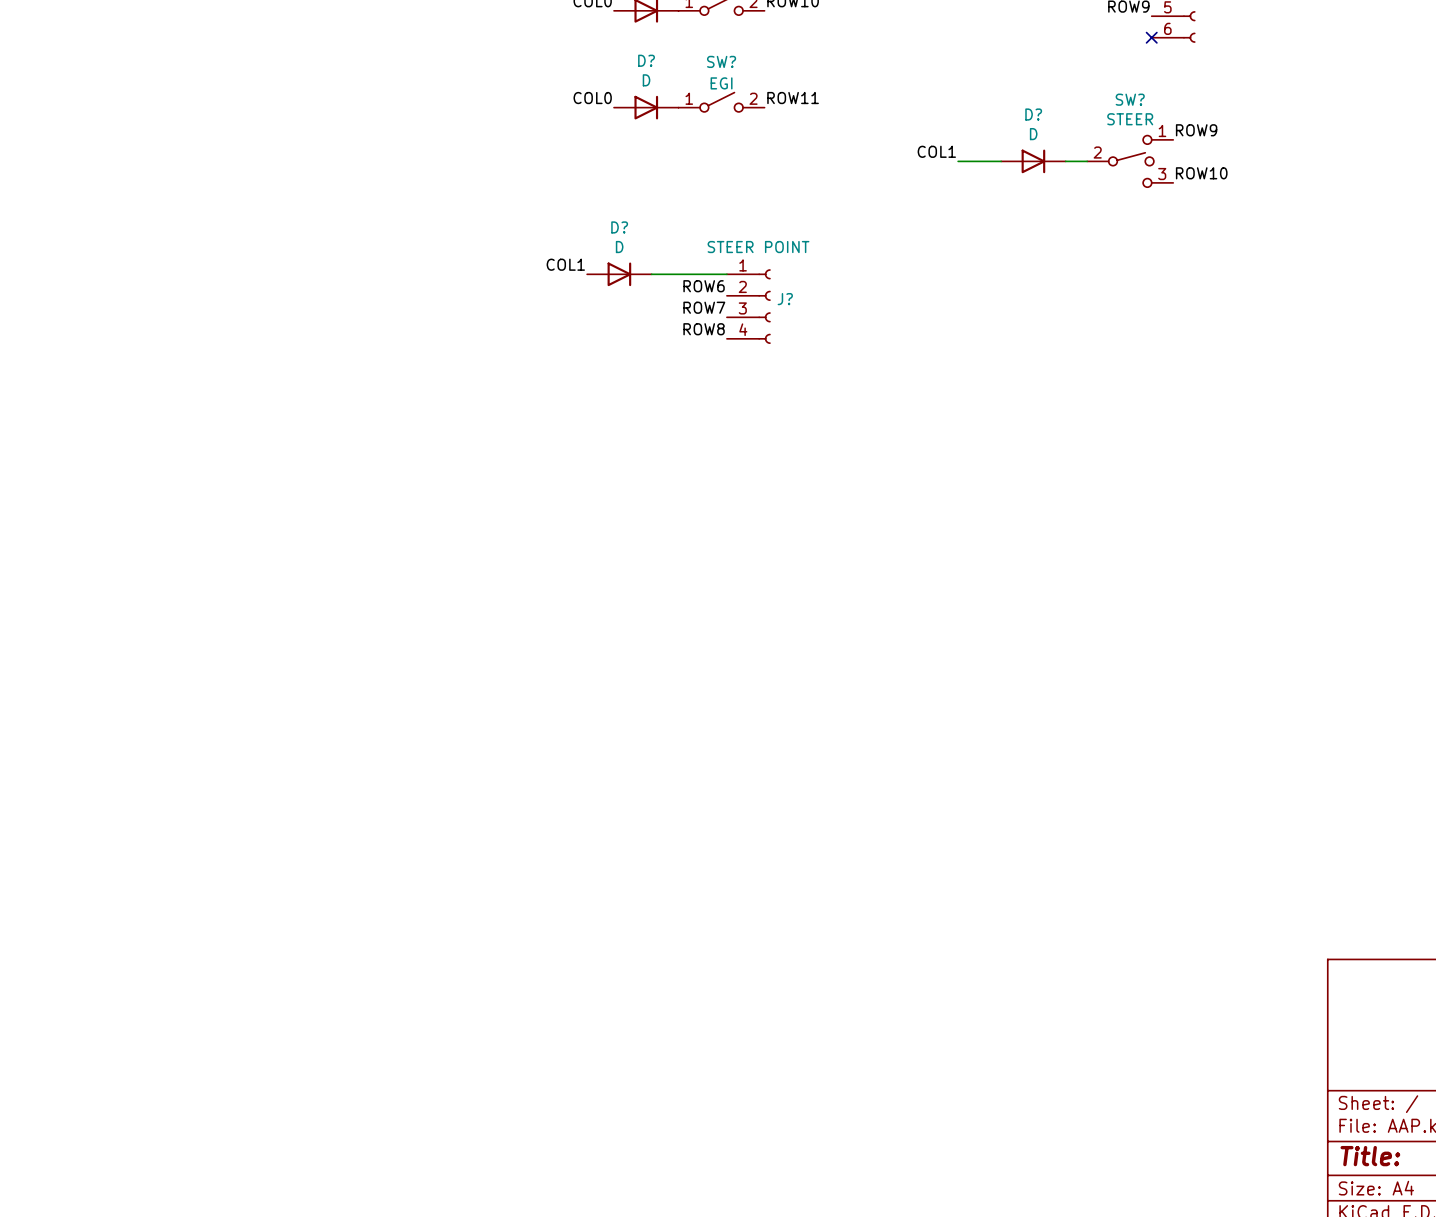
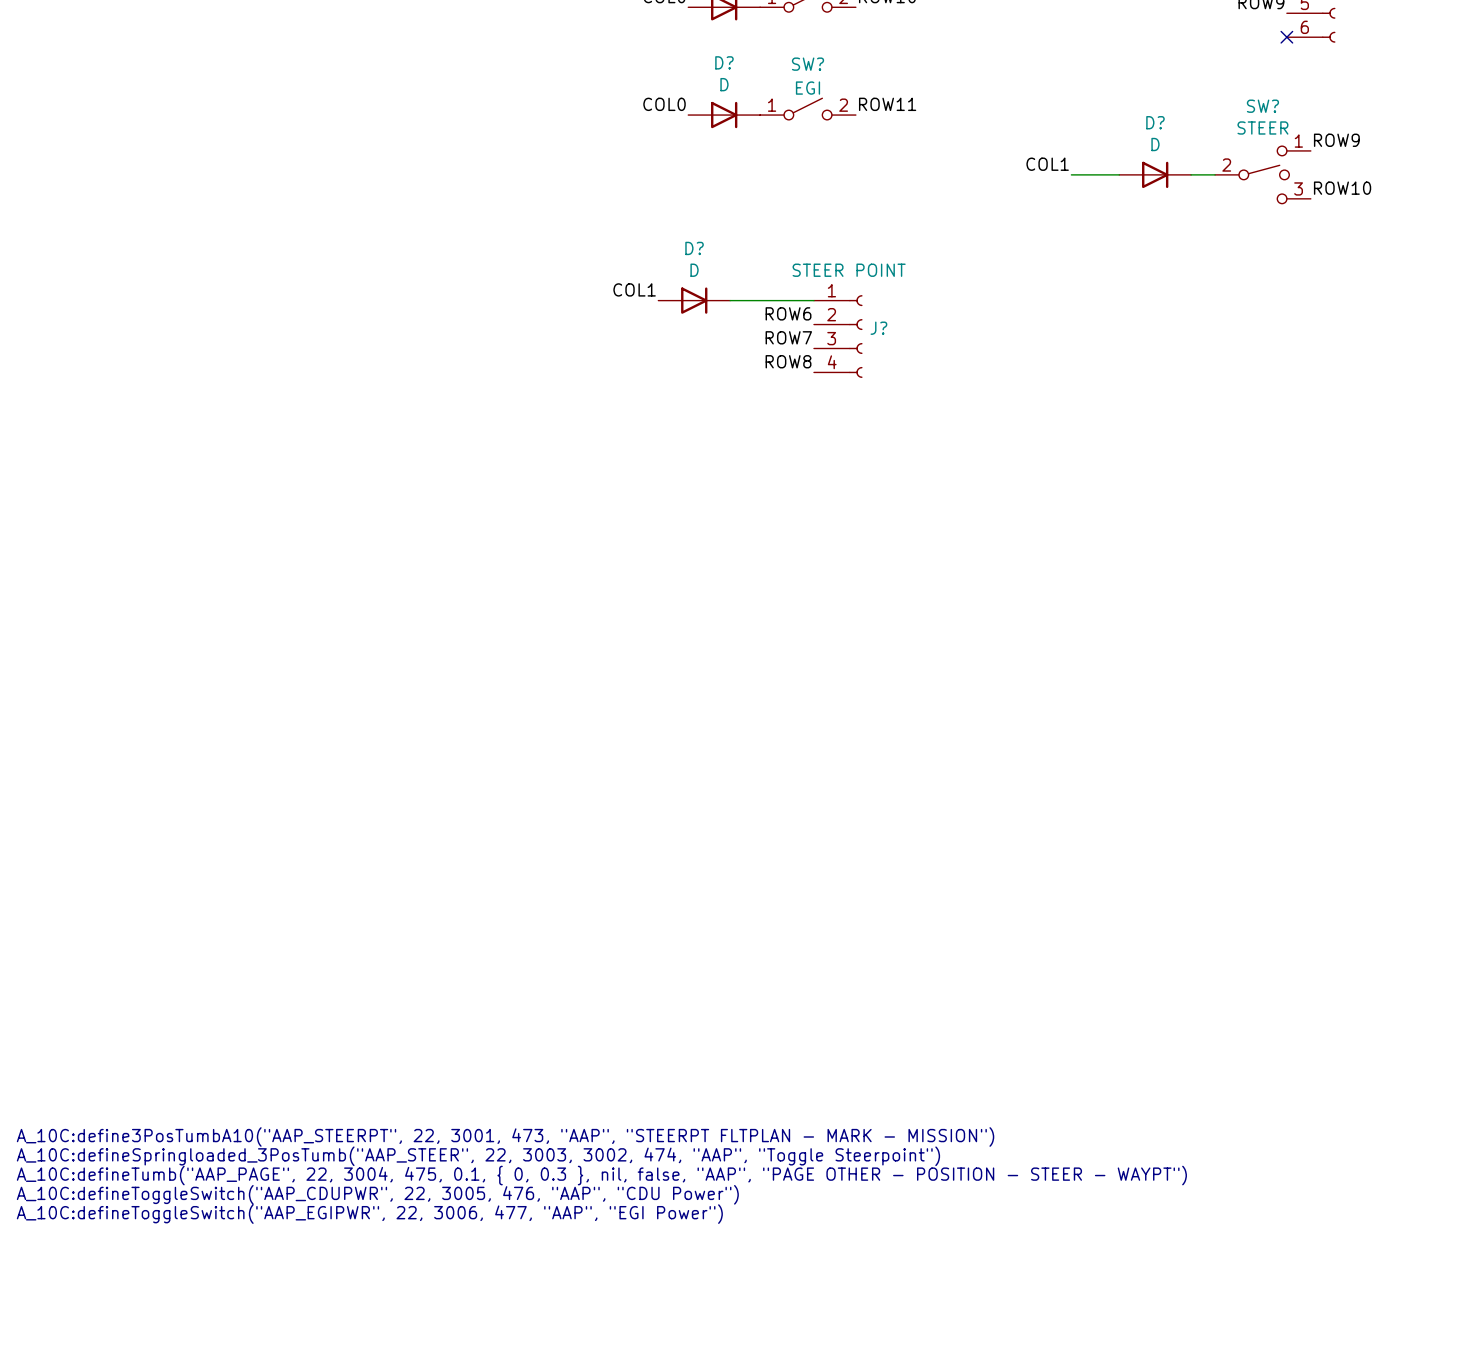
text: none -> A_10C:define3PosTumbA10("AAP_STEERPT", 22, 3001, 473, "AAP", "STEERPT FLTPLAN - MARK - MISSION") (505, 1136)
text: none -> A_10C:defineSpringloaded_3PosTumb("AAP_STEER", 22, 3003, 3002, 474, "AAP", "Toggle Steerpoint") (478, 1156)
text: none -> A_10C:defineTumb("AAP_PAGE", 22, 3004, 475, 0.1, { 0, 0.3 }, nil, false, "AAP", "PAGE OTHER - POSITION - STEER - WAYPT") (601, 1175)
text: none -> A_10C:defineToggleSwitch("AAP_CDUPWR", 22, 3005, 476, "AAP", "CDU Power") (377, 1194)
text: none -> A_10C:defineToggleSwitch("AAP_EGIPWR", 22, 3006, 477, "AAP", "EGI Power") (369, 1214)

